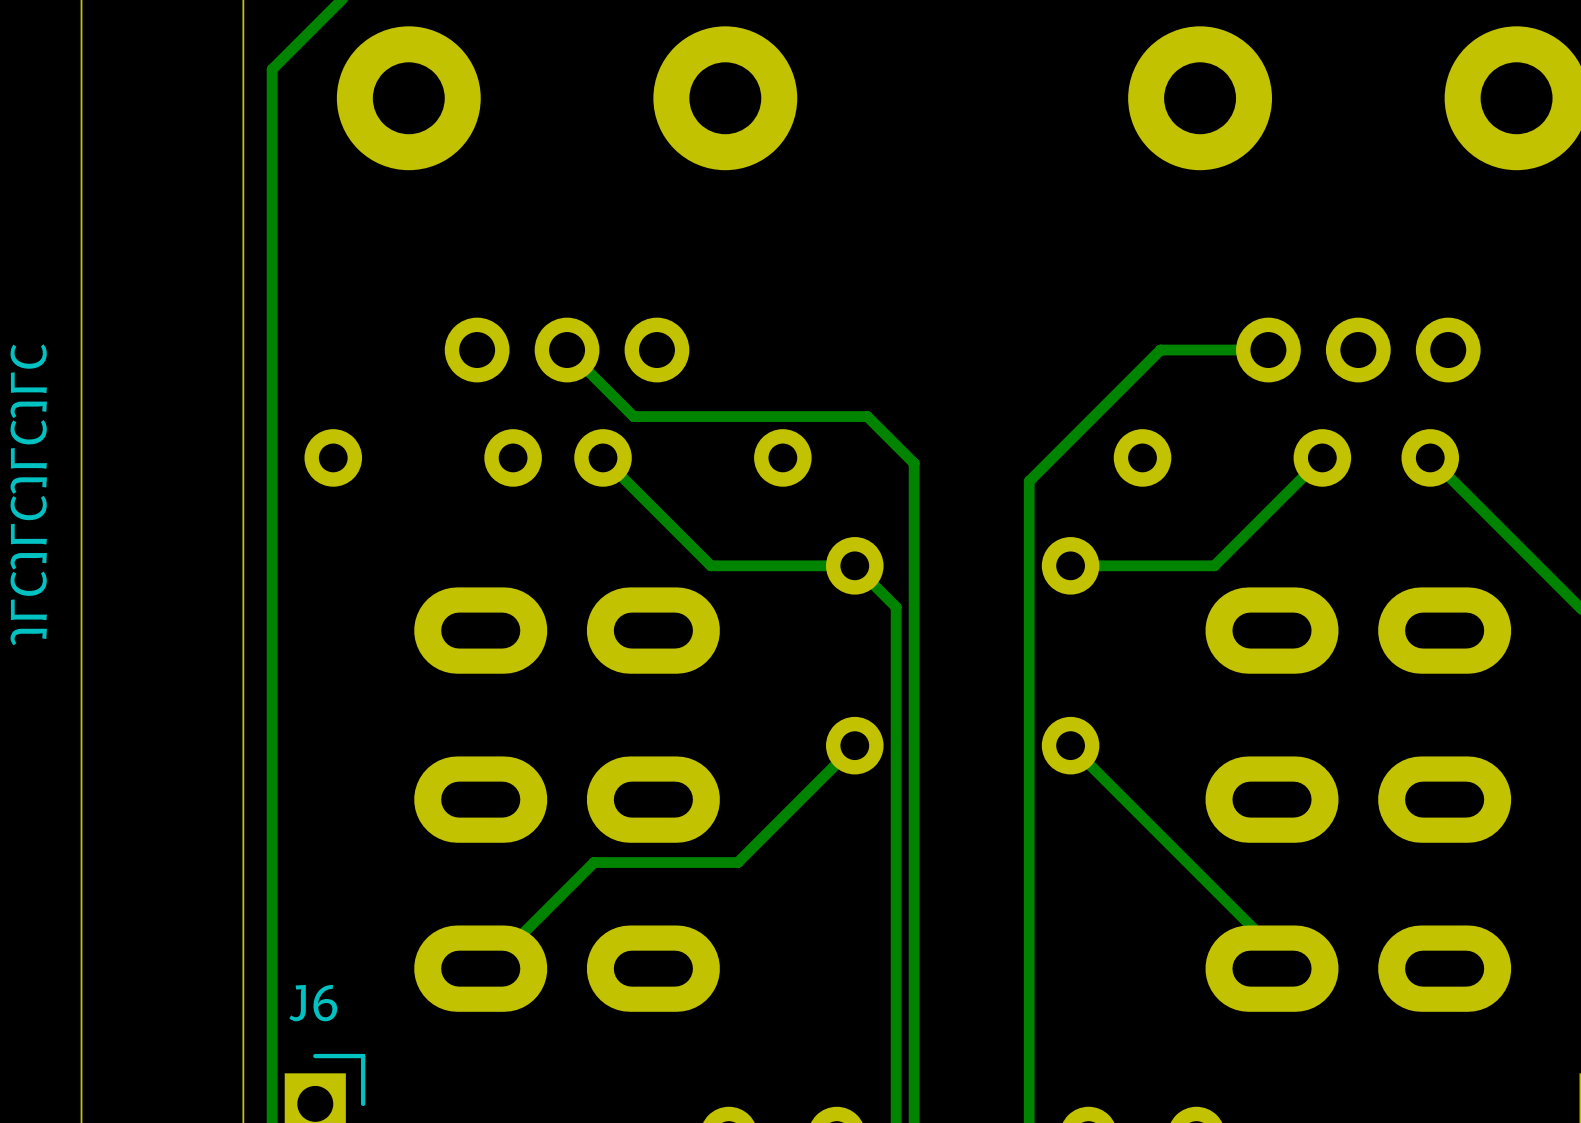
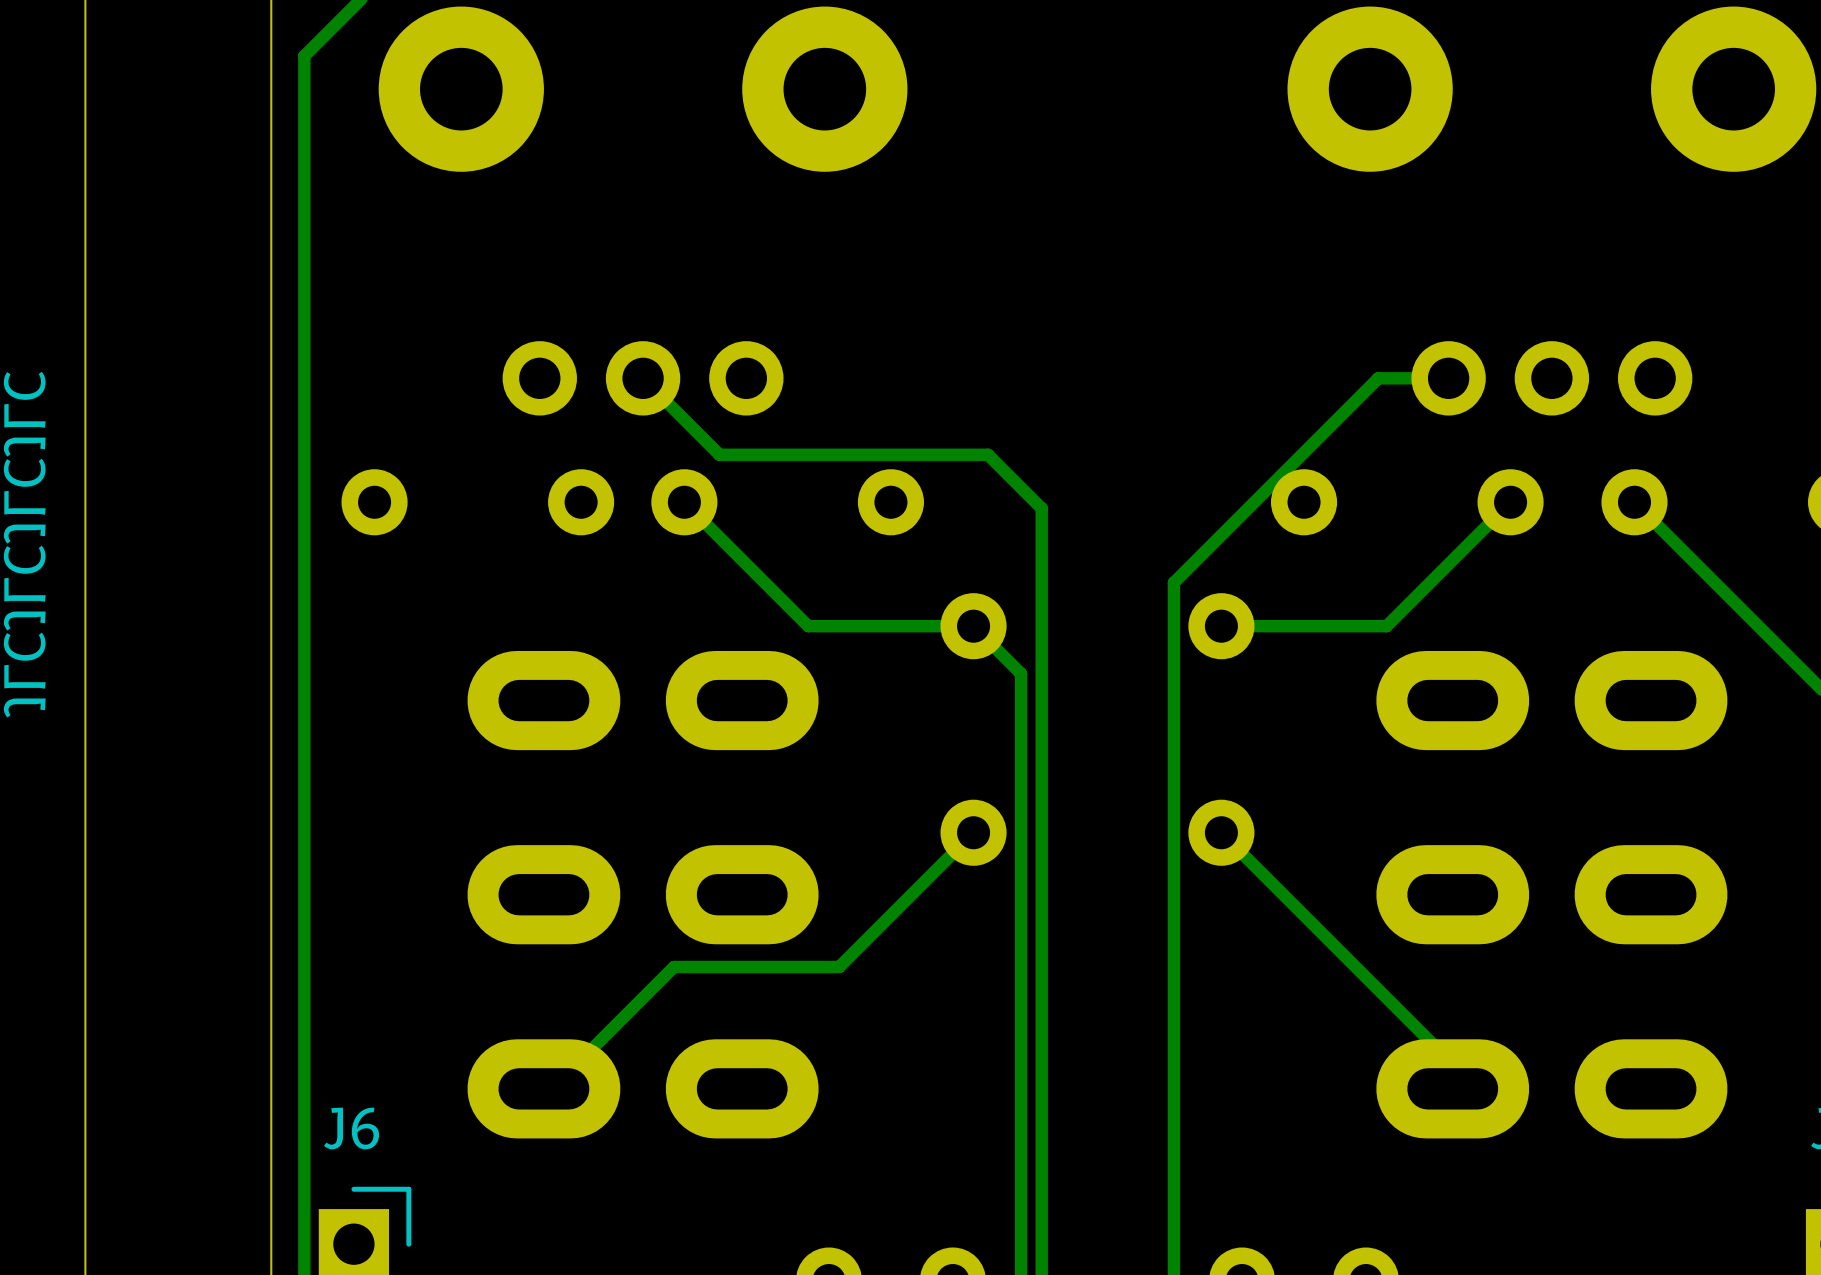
track: (1207, 350) (1160, 350) (1029, 481) (1029, 527) -> (1378, 378) (1173, 582)

